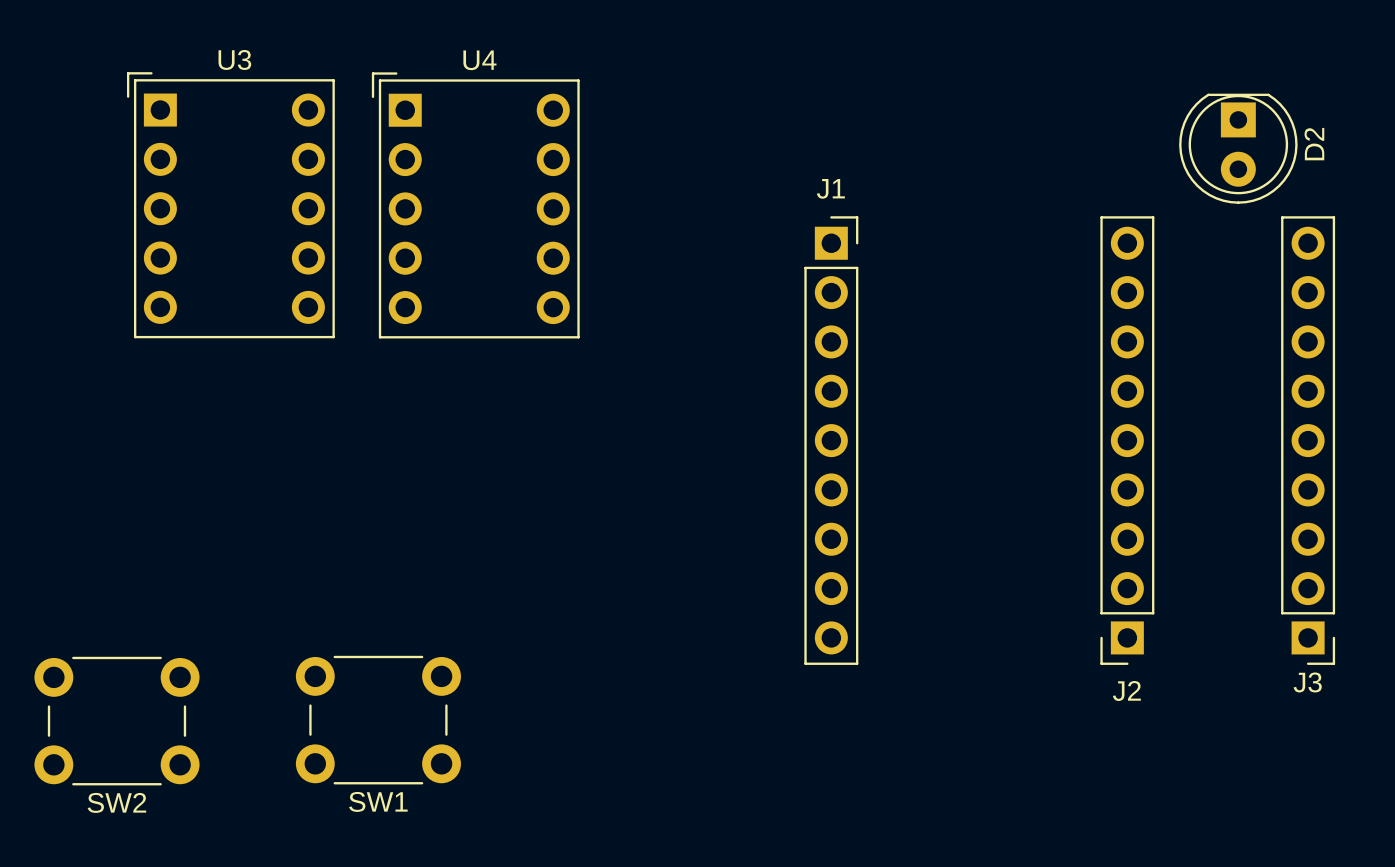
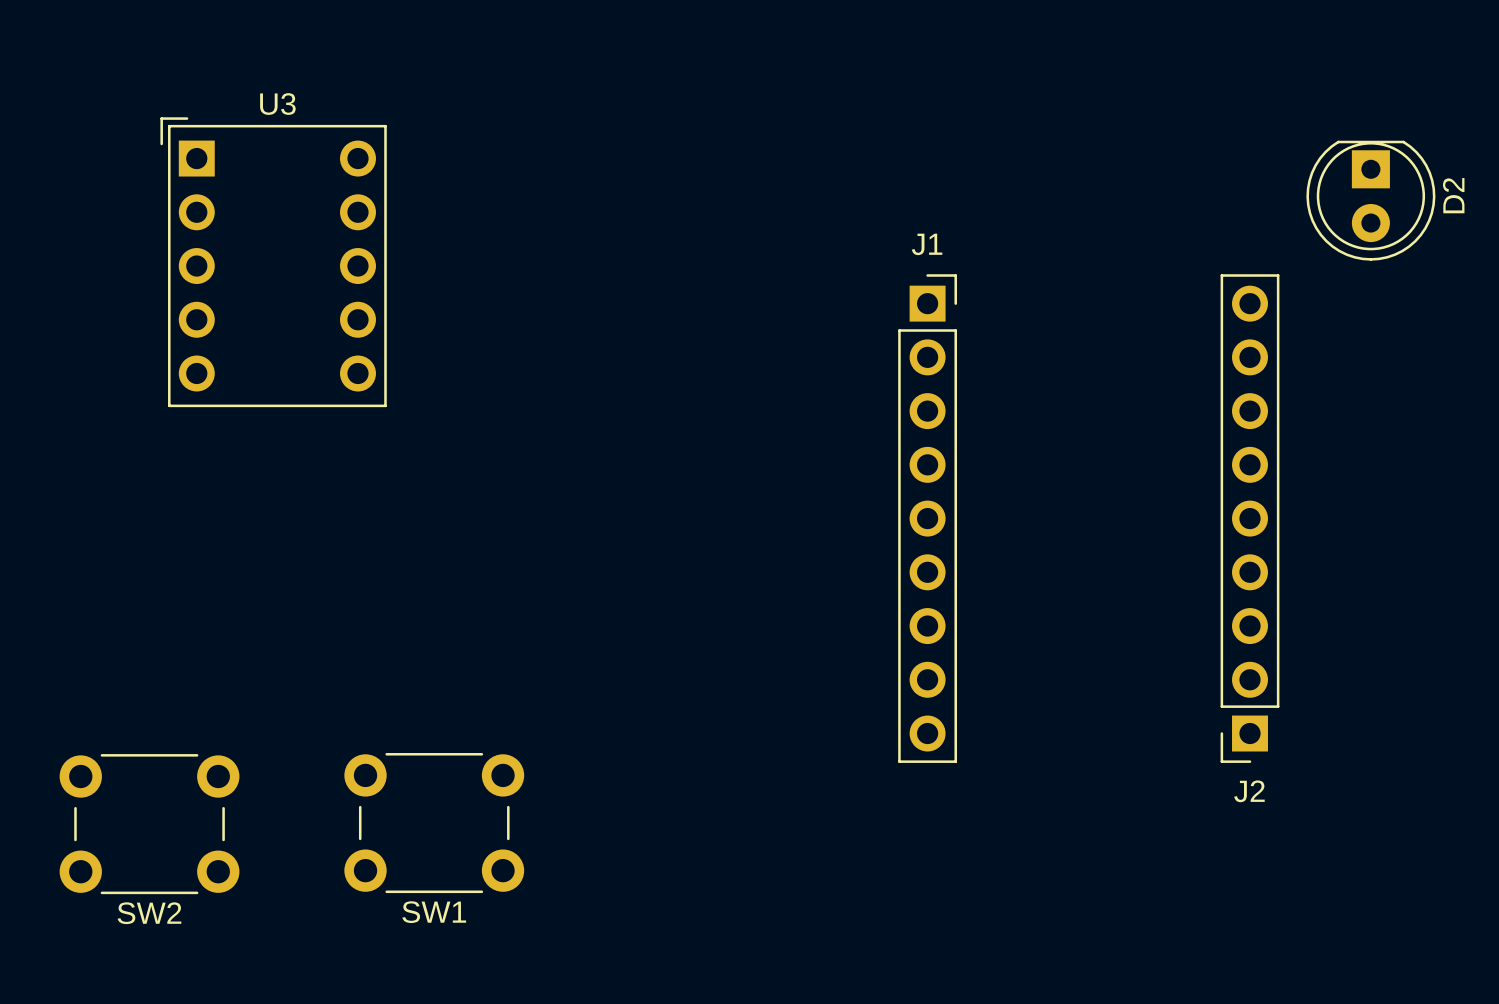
U4: (475, 205) -> none
J3: (1308, 440) -> none

